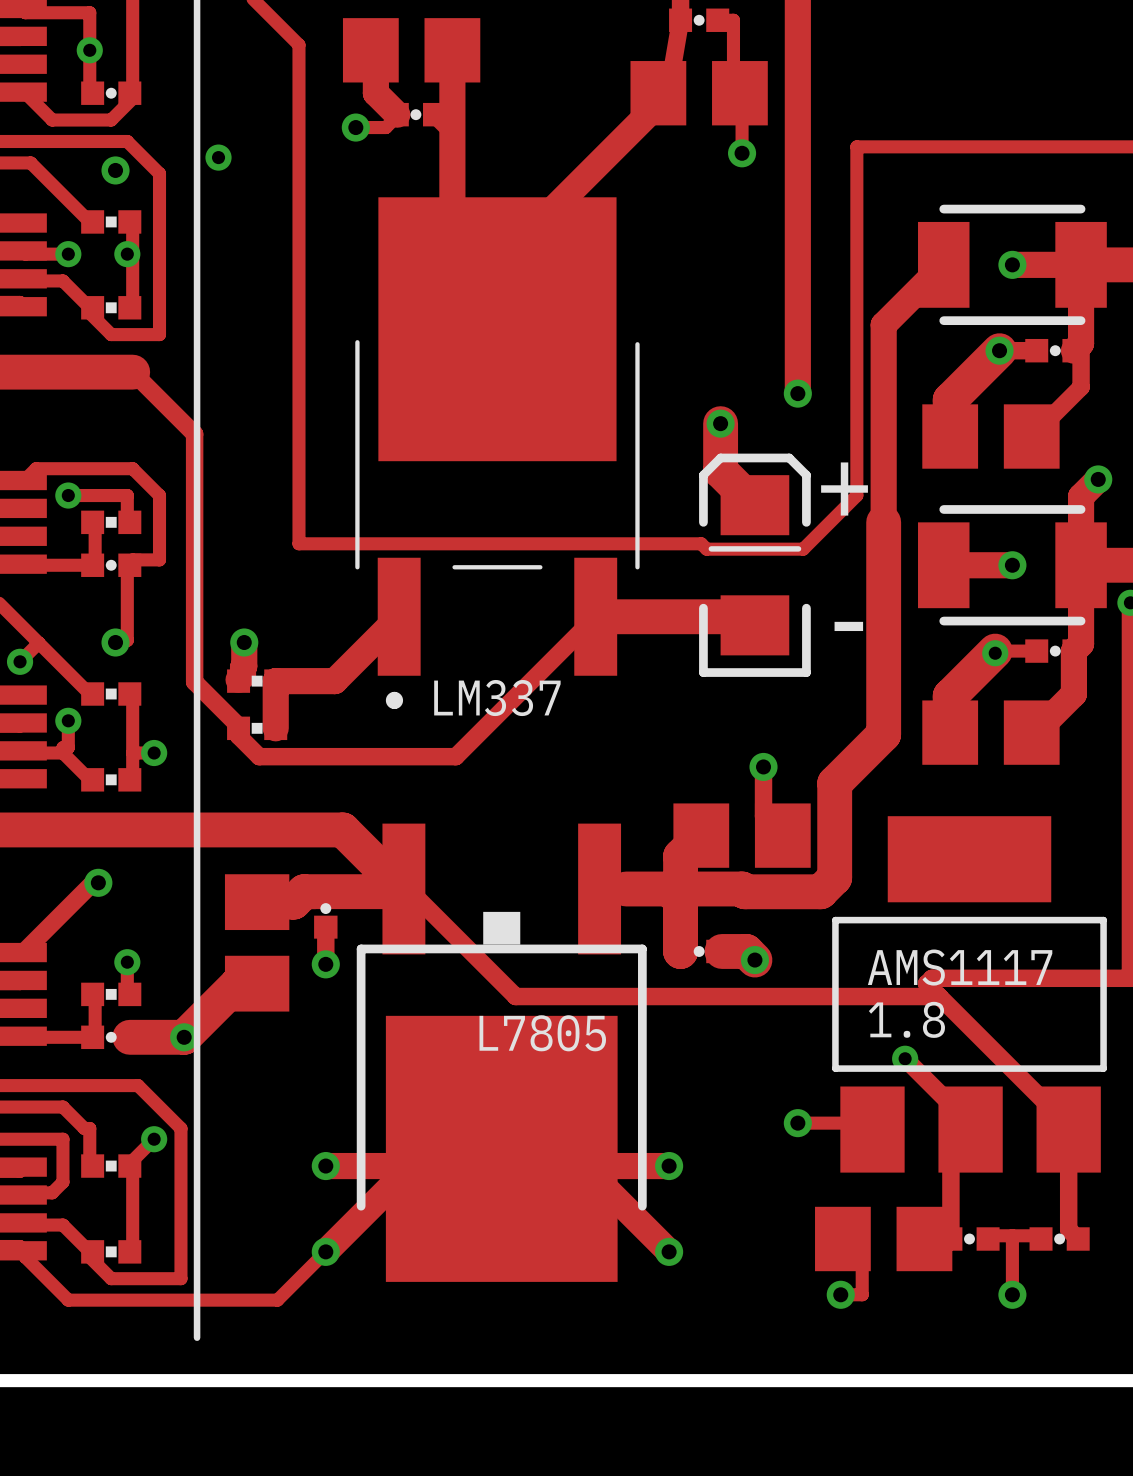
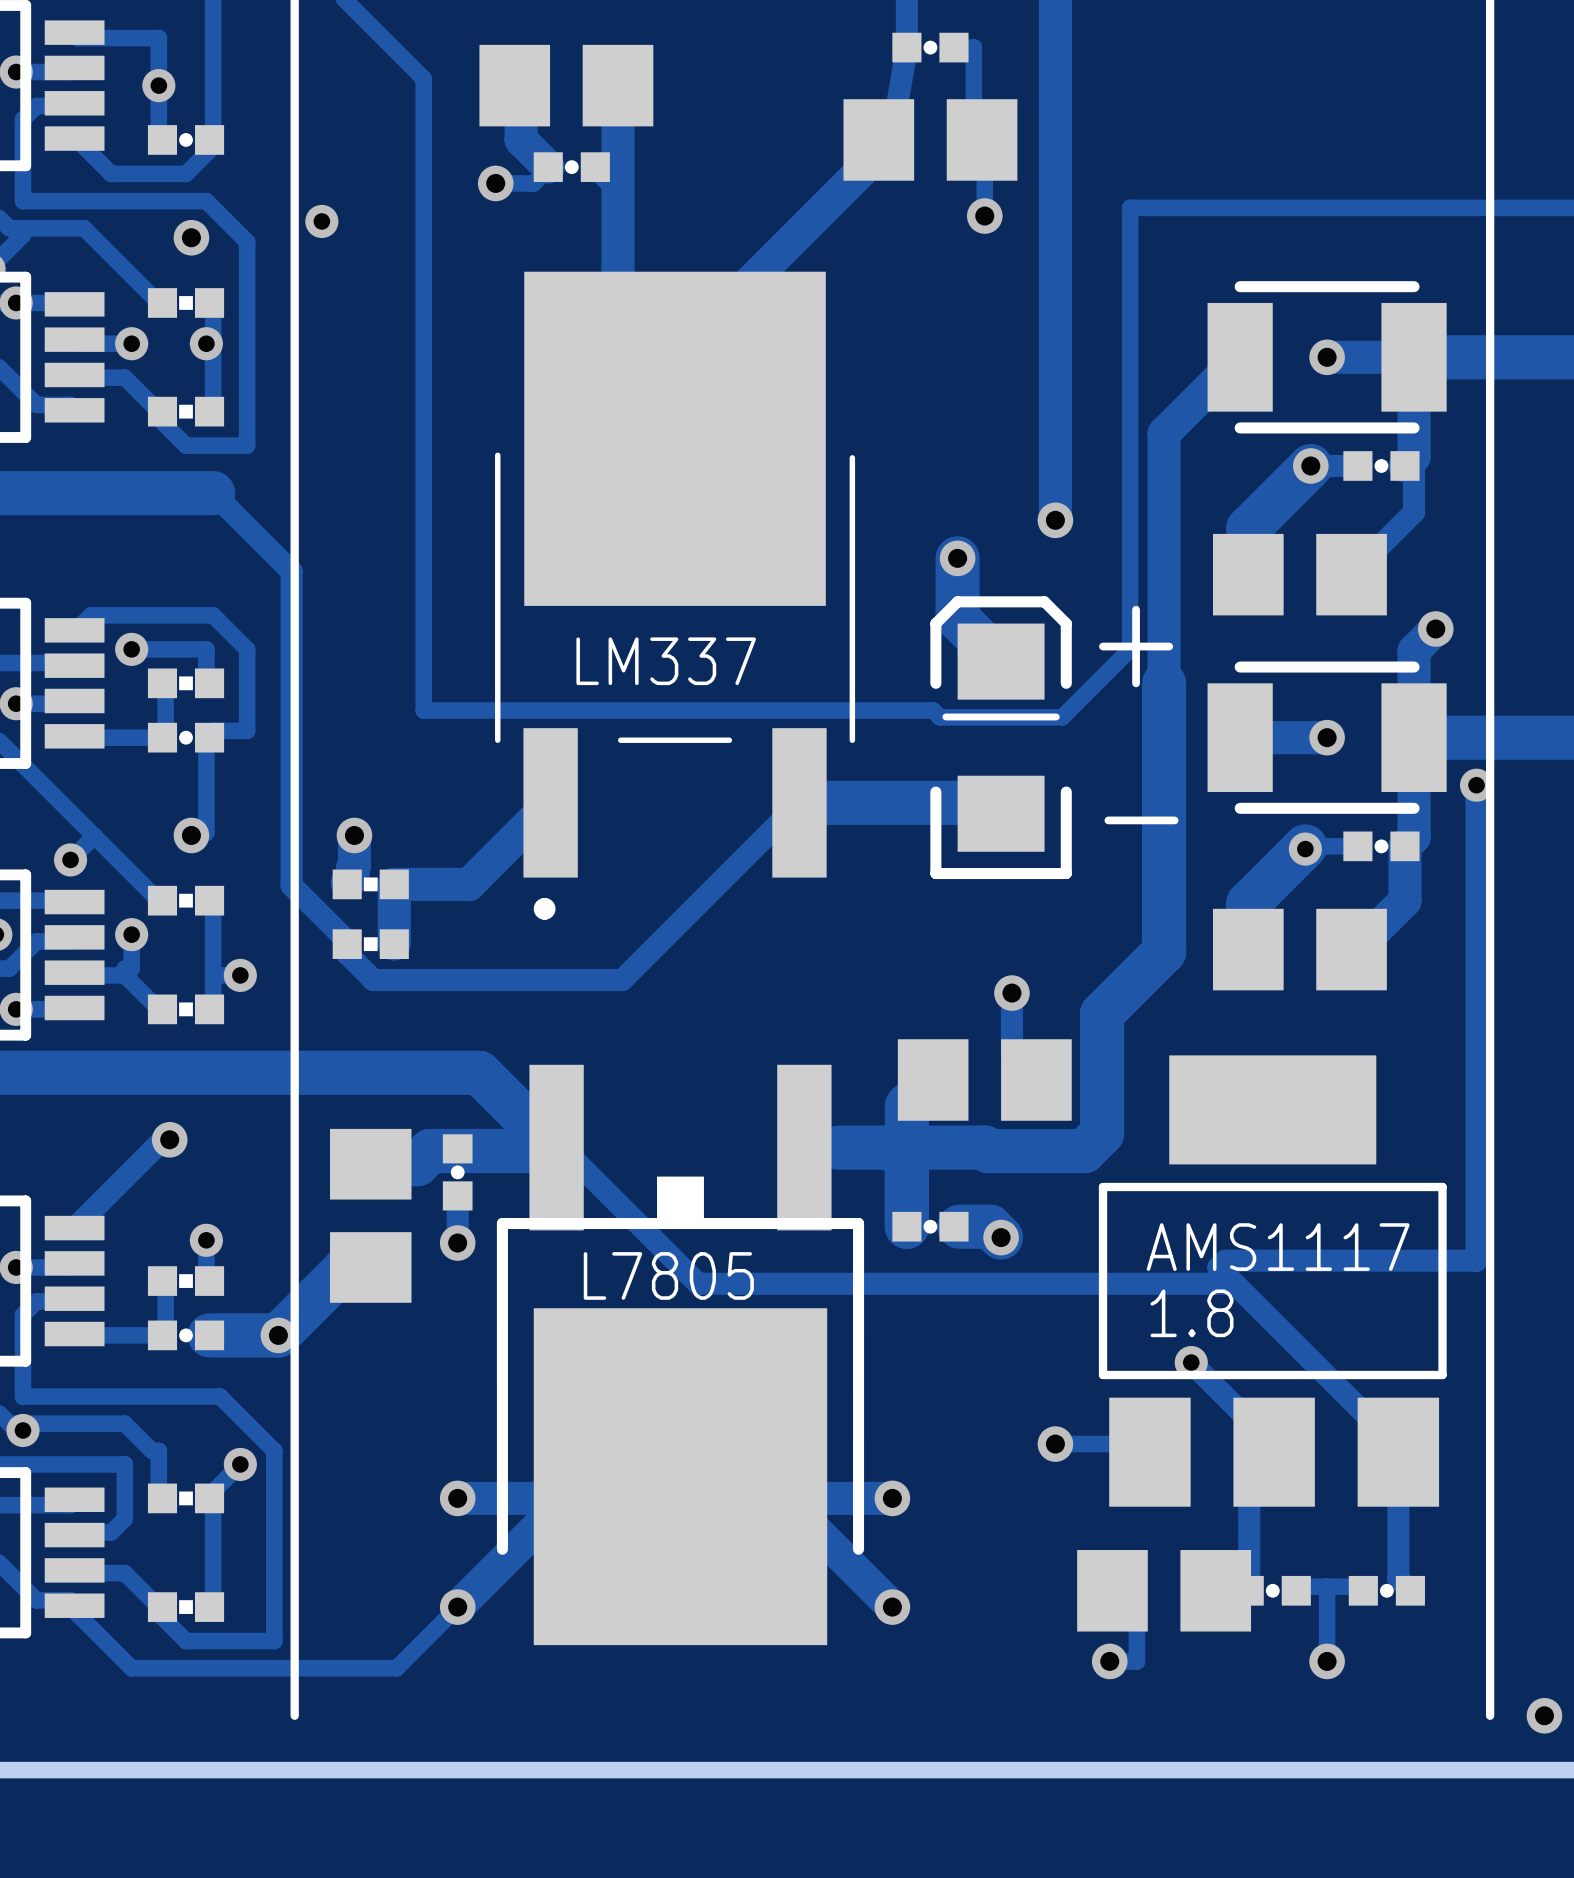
text position: LM337 (497, 698) -> LM337 (666, 661)
text position: L7805 (542, 1033) -> L7805 (668, 1275)

